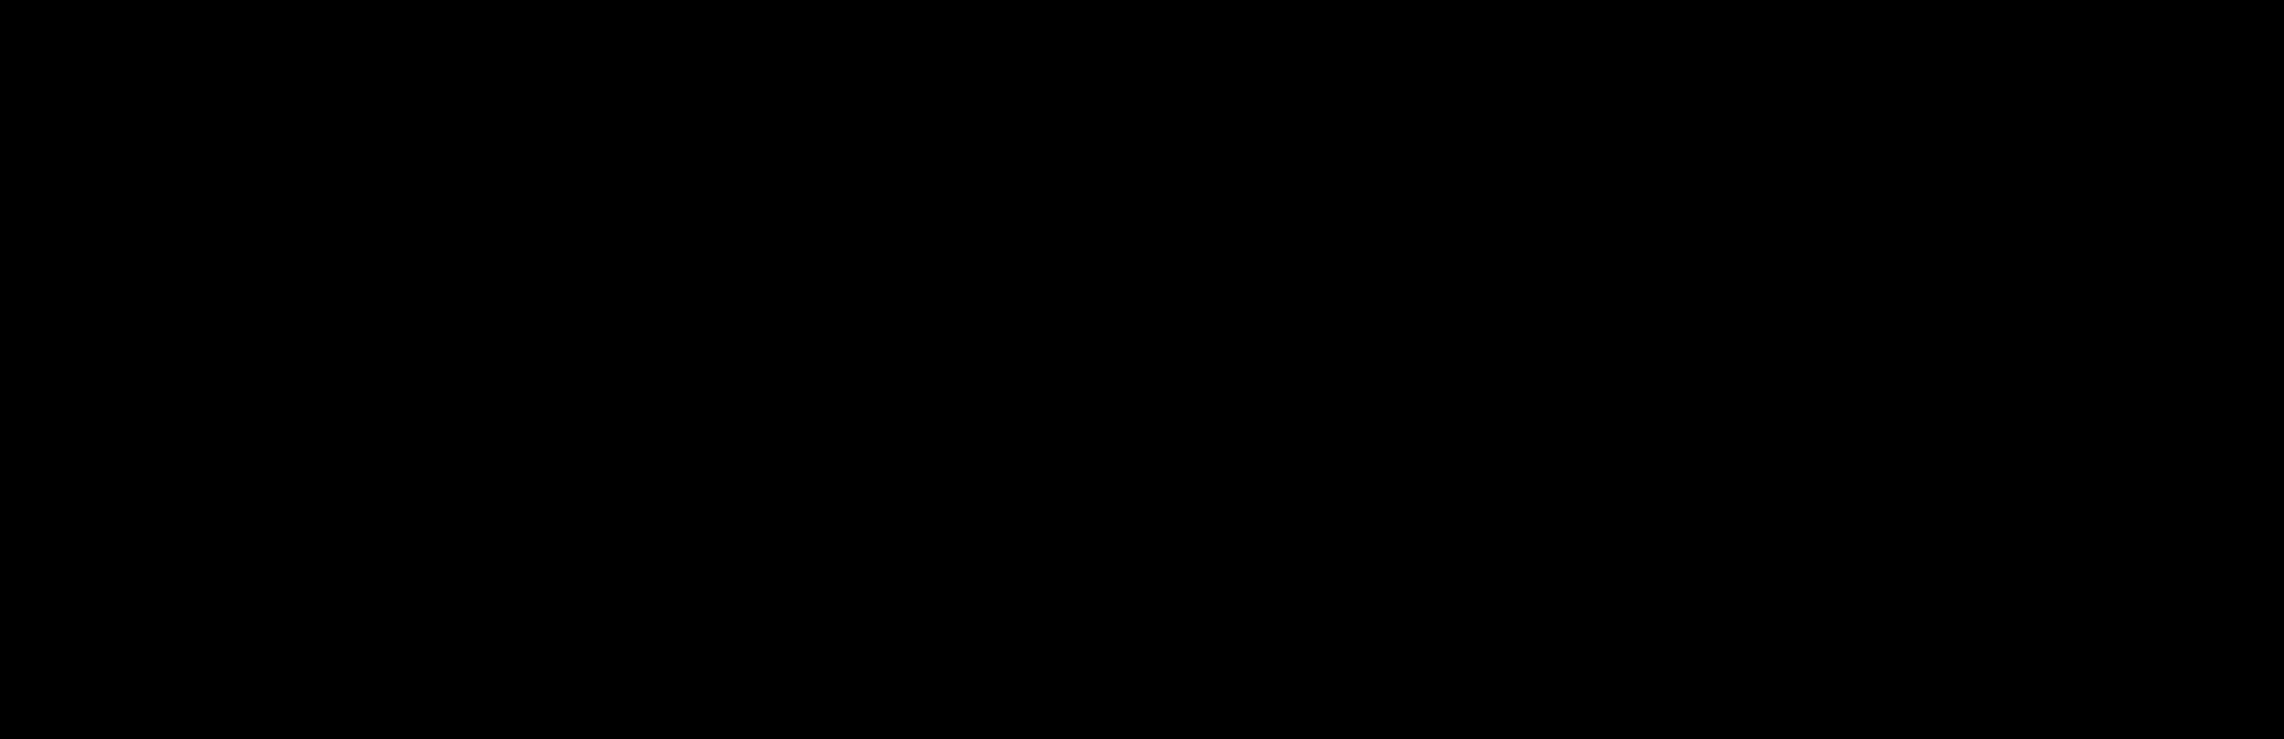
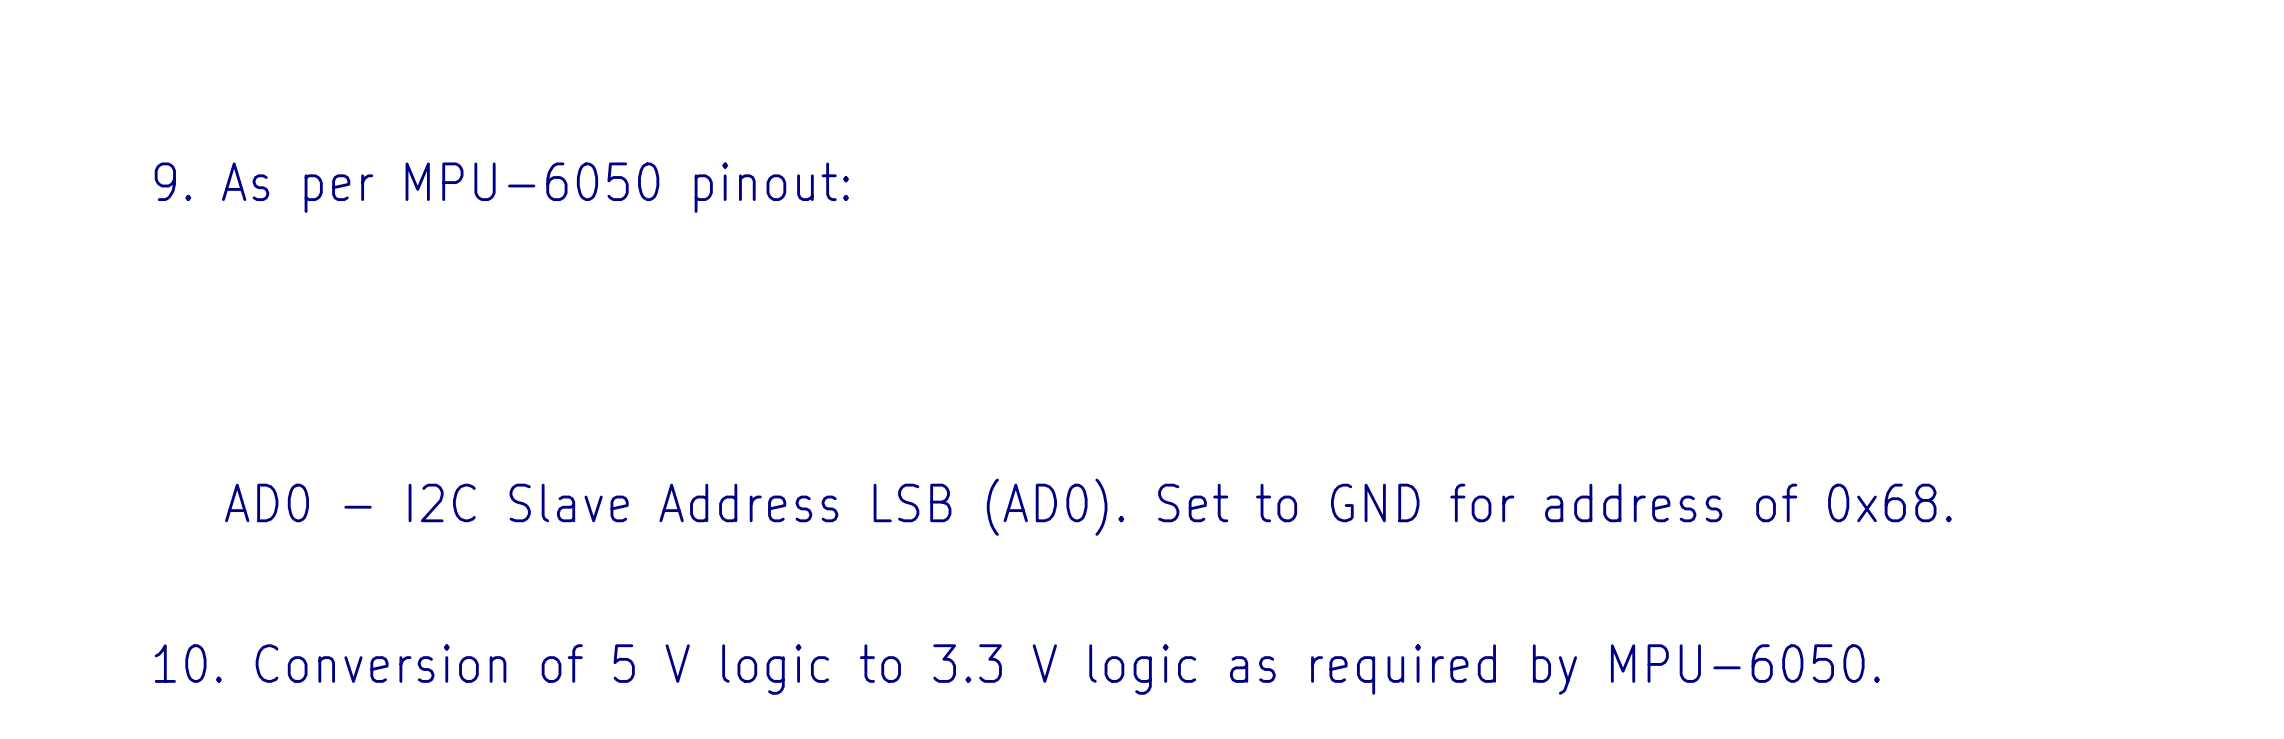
text: none -> 9. As per MPU-6050 pinout: (501, 187)
text: none -> AD0 - I2C Slave Address LSB (AD0). Set to GND for address of 0x68. (1088, 507)
text: none -> 10. Conversion of 5 V logic to 3.3 V logic as required by MPU-6050. (1017, 669)

